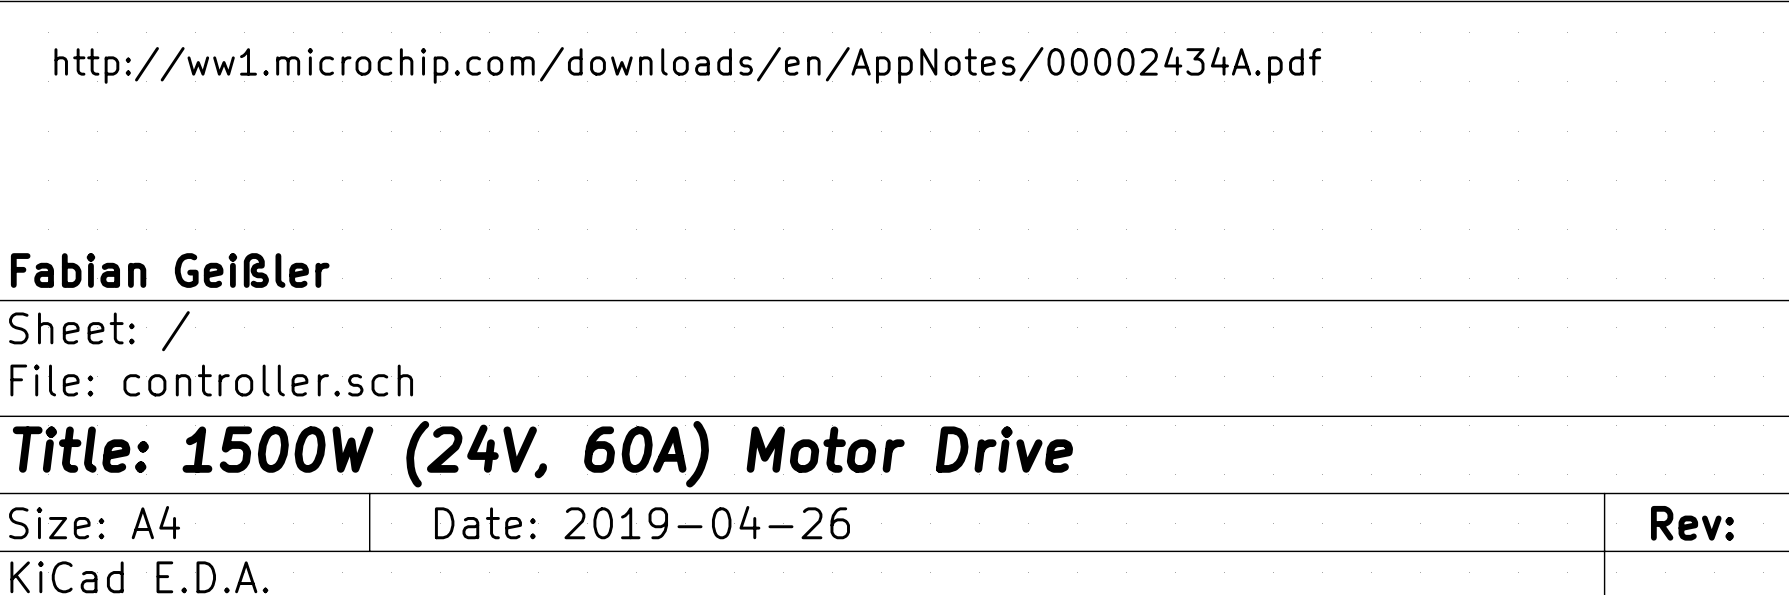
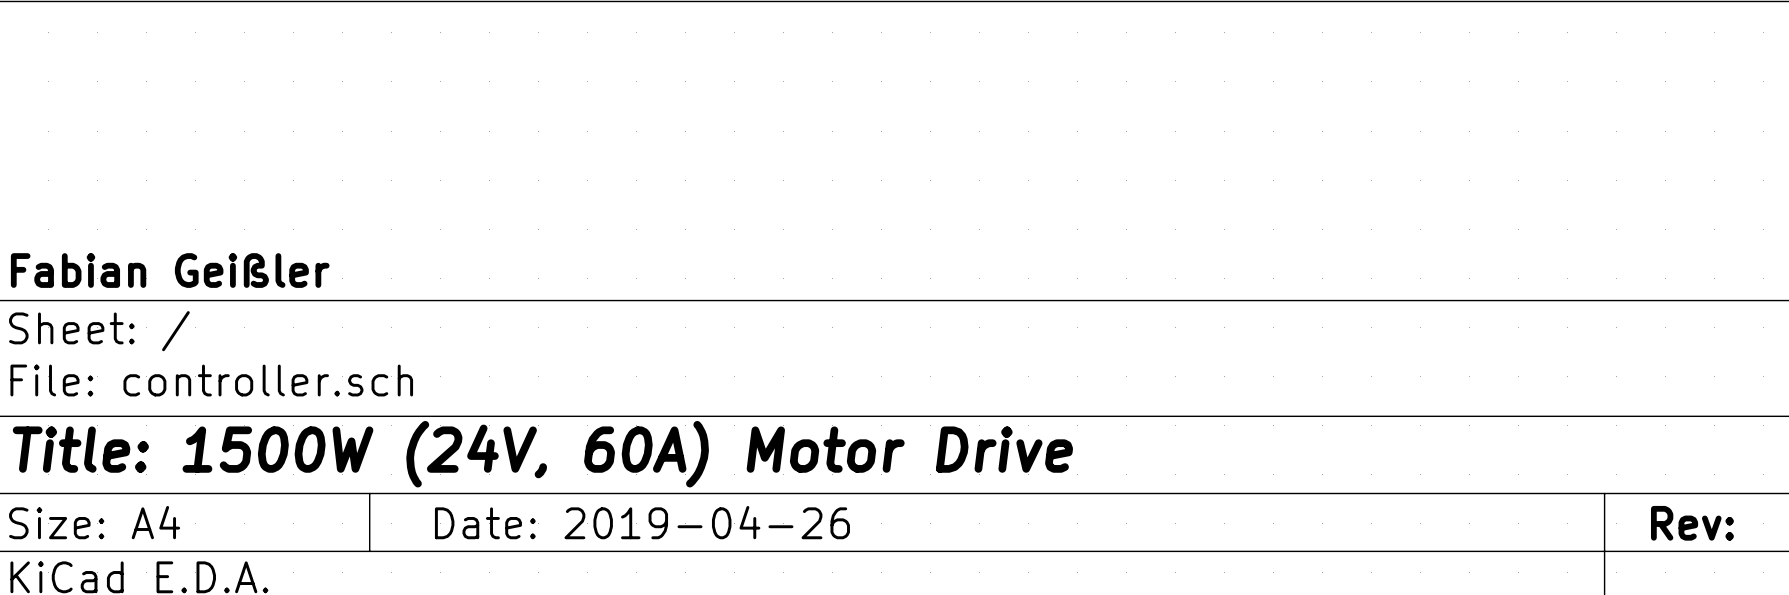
text: http://ww1.microchip.com/downloads/en/AppNotes/00002434A.pdf (687, 65) -> none

